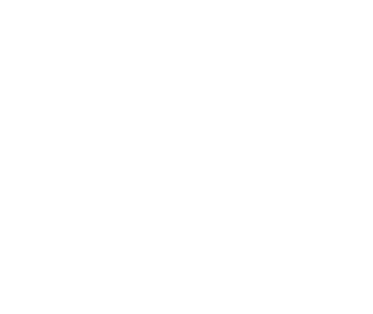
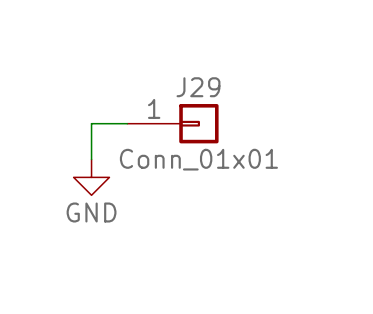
wire: none -> (127, 123) (91, 123) (91, 159)
J29: none -> Conn_01x01 (172, 123)
power symbol: none -> GND (91, 177)

